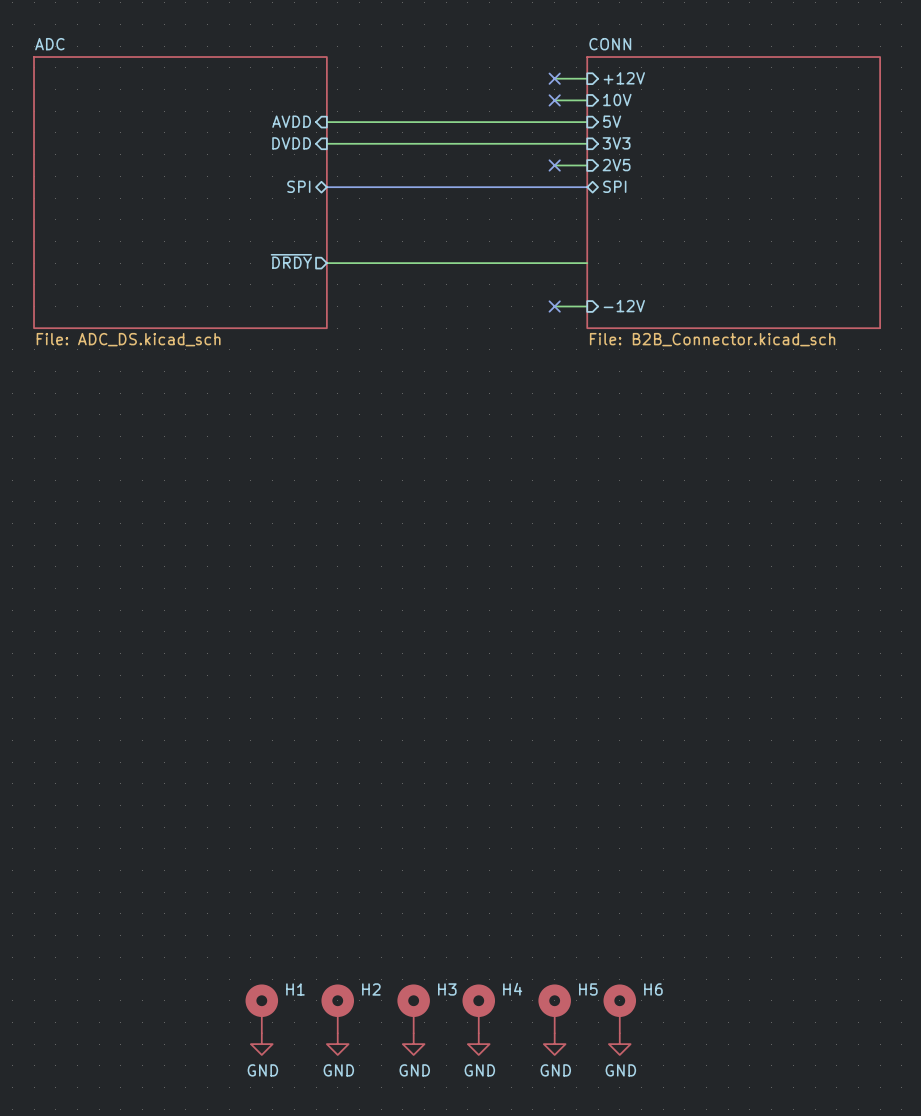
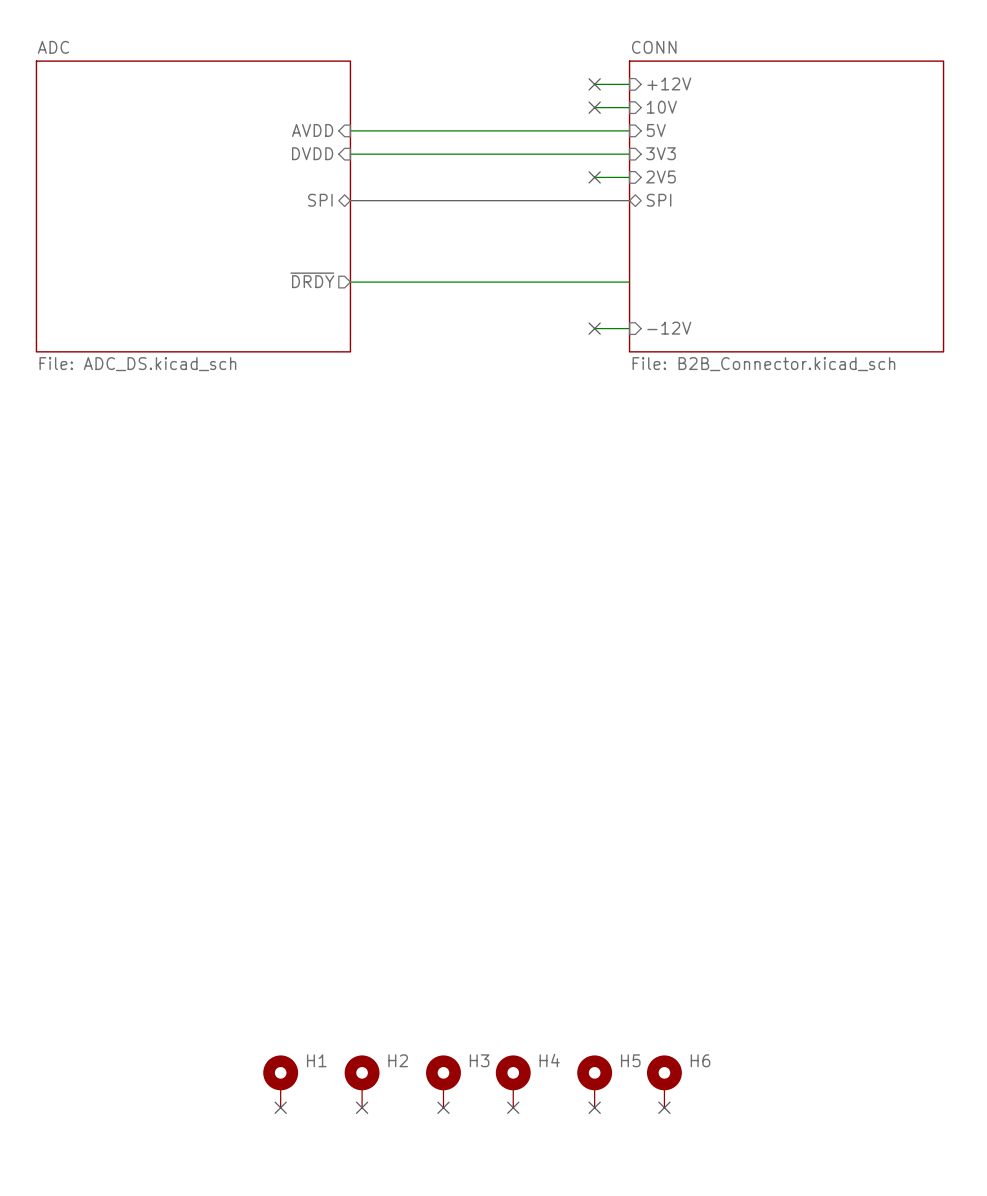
no-connect mark: none -> (280, 1107)
no-connect mark: none -> (362, 1107)
no-connect mark: none -> (443, 1107)
no-connect mark: none -> (513, 1107)
no-connect mark: none -> (594, 1107)
no-connect mark: none -> (664, 1107)
power symbol: GND (261, 1044) -> none
power symbol: GND (337, 1044) -> none
power symbol: GND (413, 1044) -> none
power symbol: GND (478, 1044) -> none
power symbol: GND (554, 1044) -> none
power symbol: GND (619, 1044) -> none

